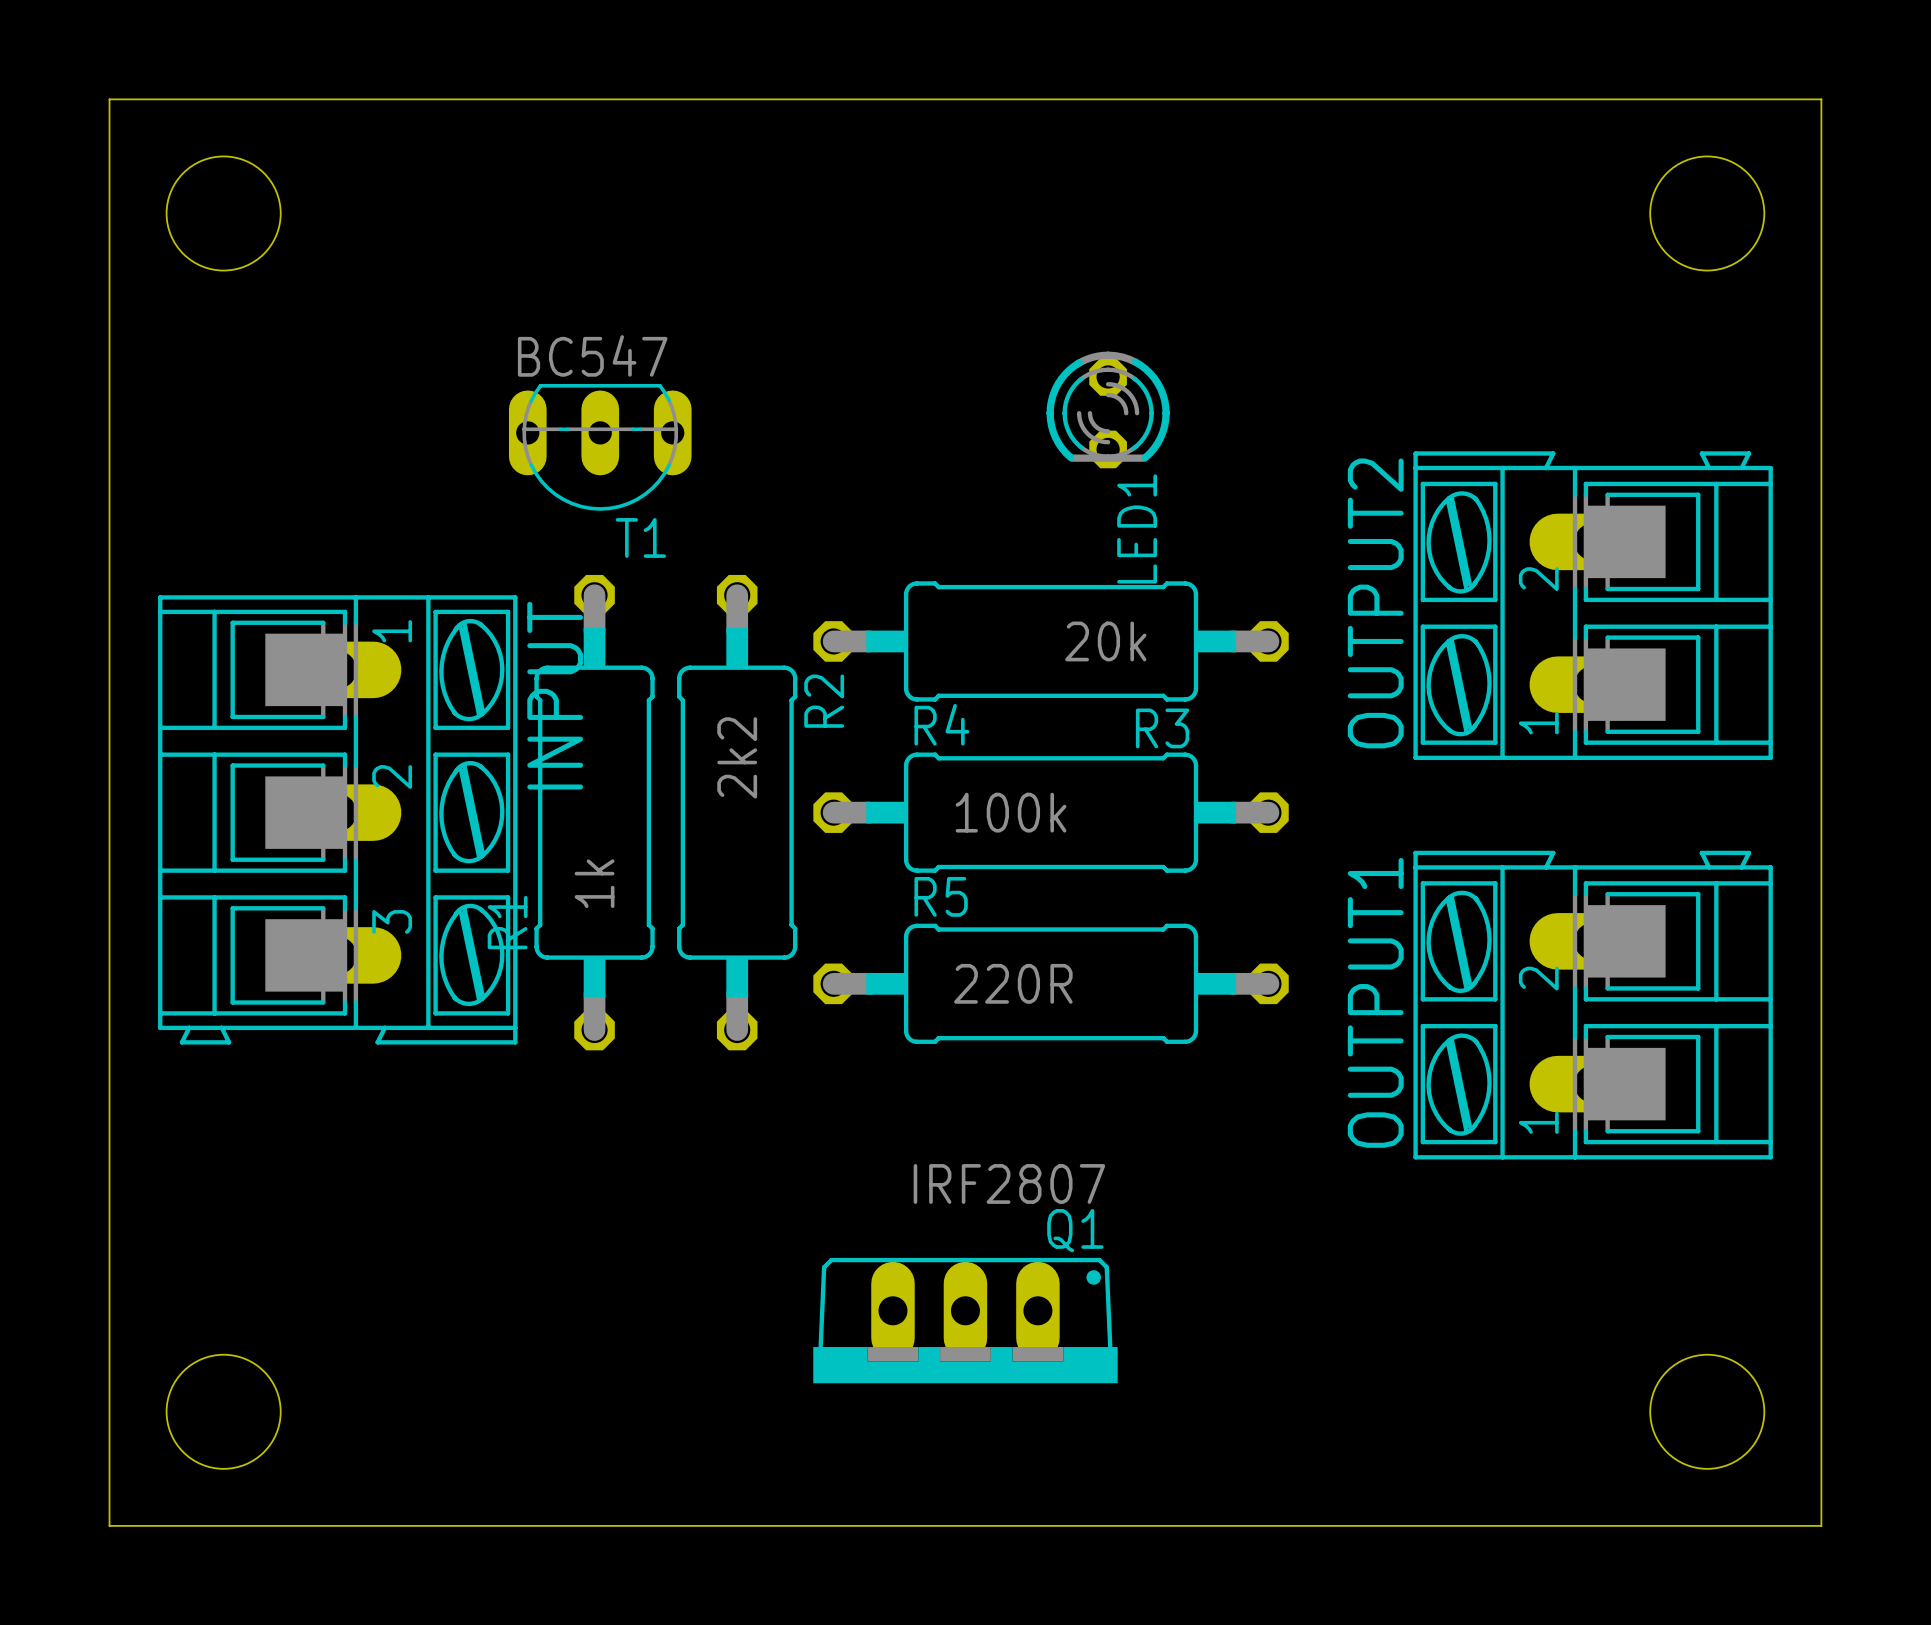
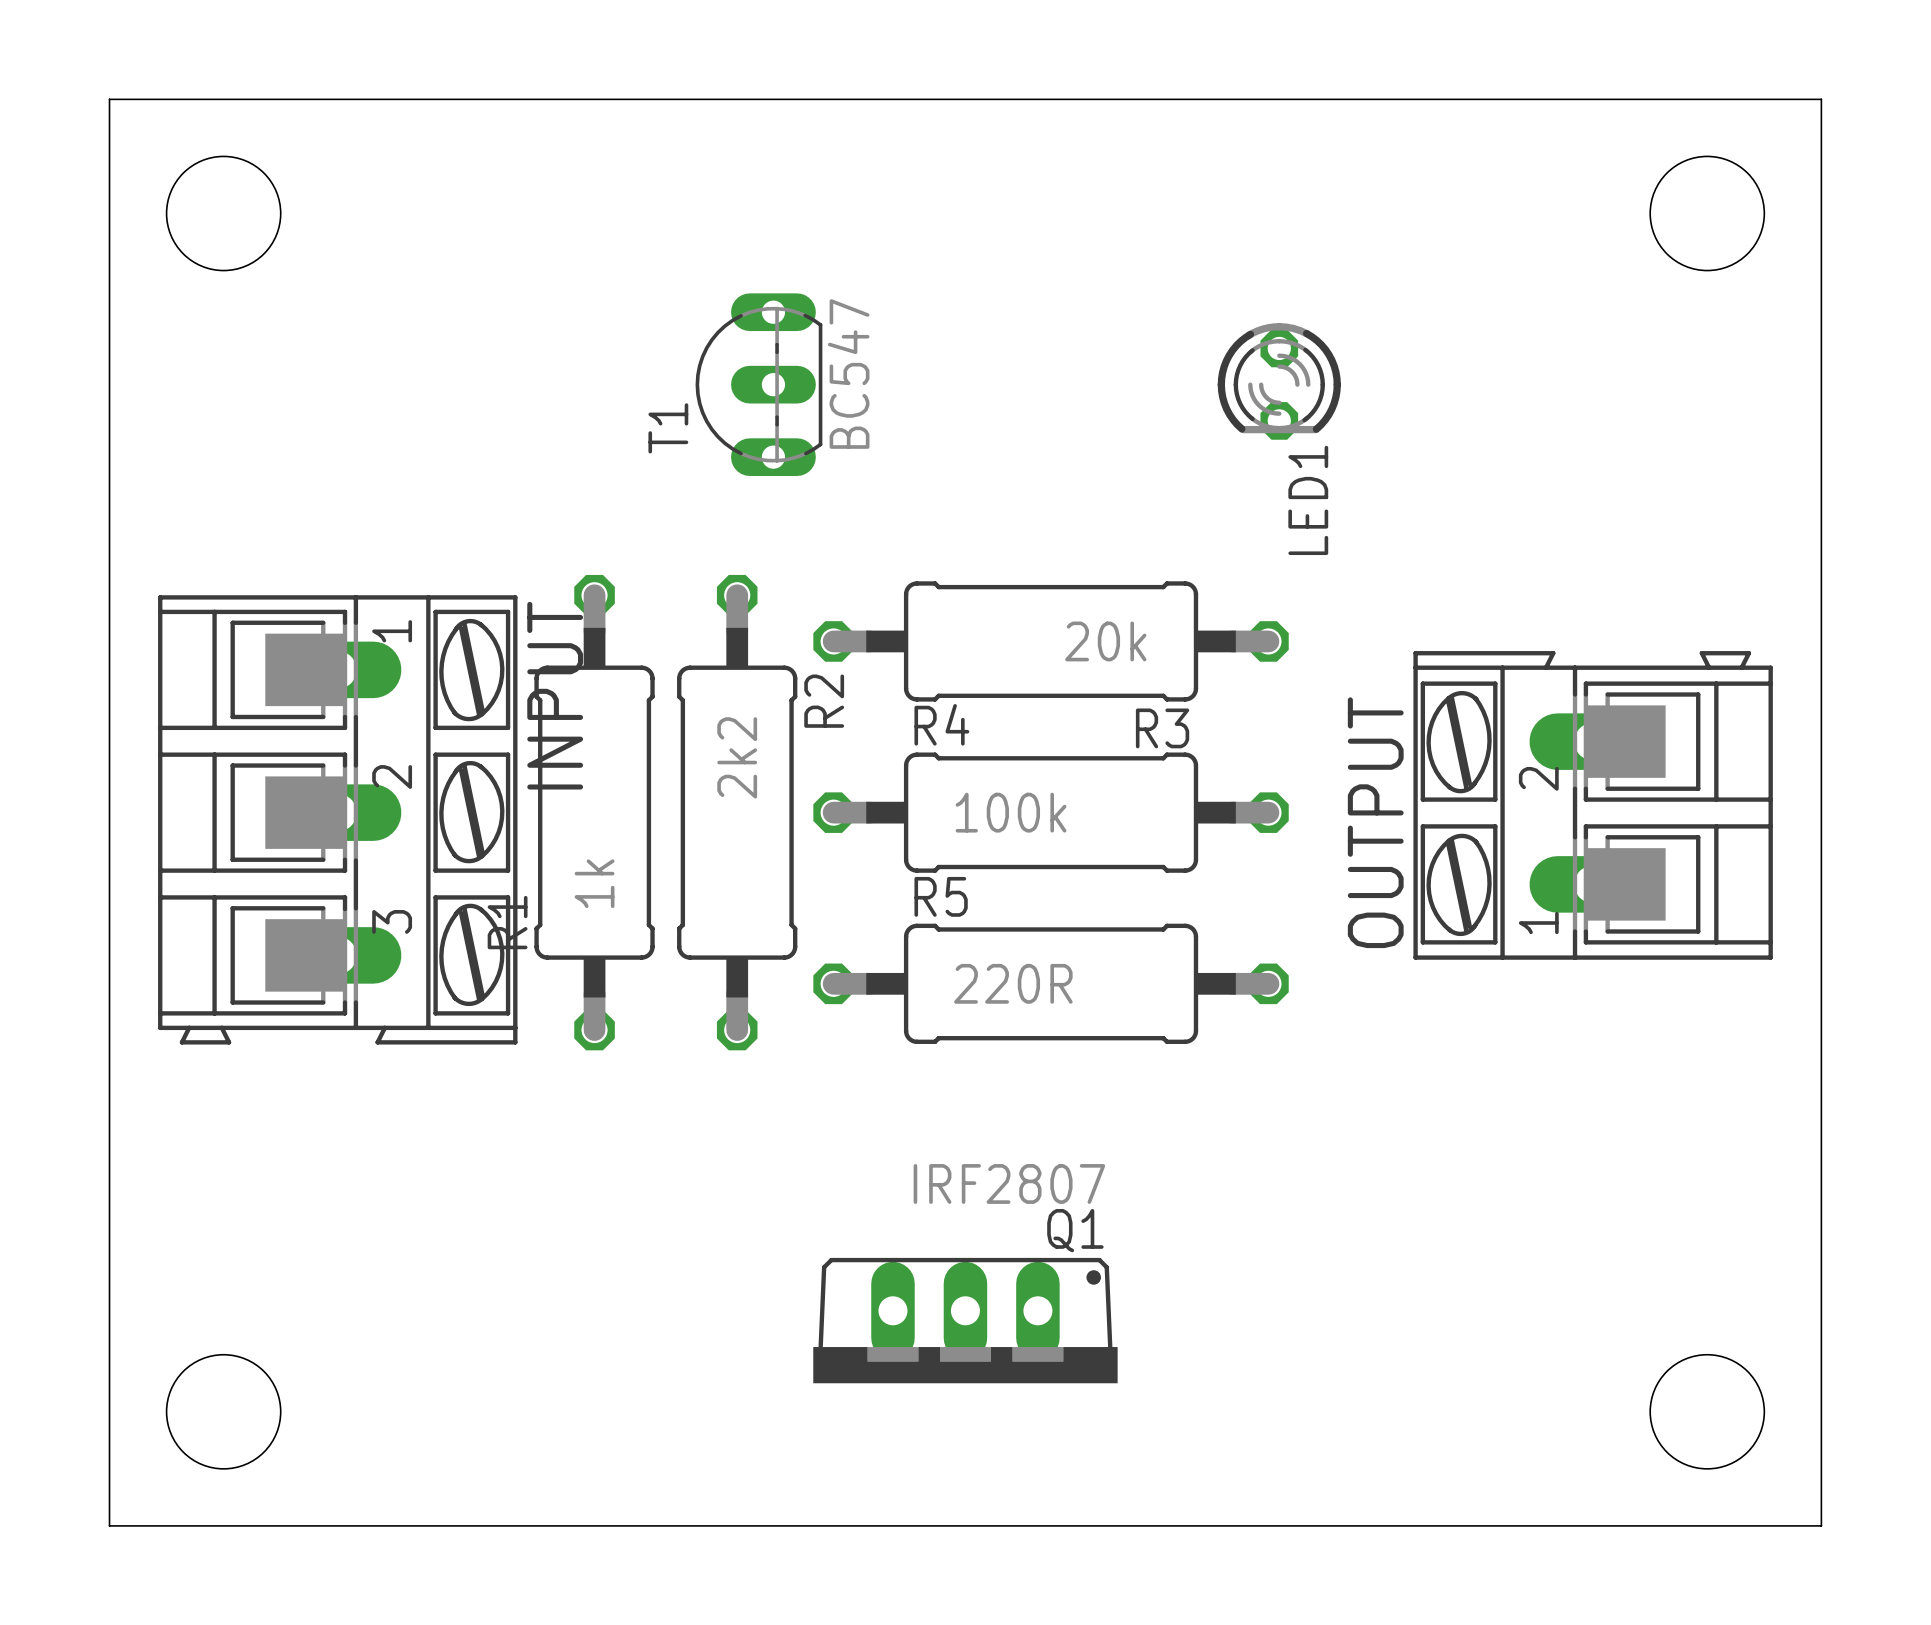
LED1 position: (1108, 409) -> (1279, 381)
T1 rotation: 0° (600, 447) -> 90° clockwise (758, 384)
T1 position: (600, 447) -> (758, 384)
OUTPUT2: (1593, 605) -> none
OUTPUT: none -> (1593, 805)
OUTPUT1: (1593, 1005) -> none

